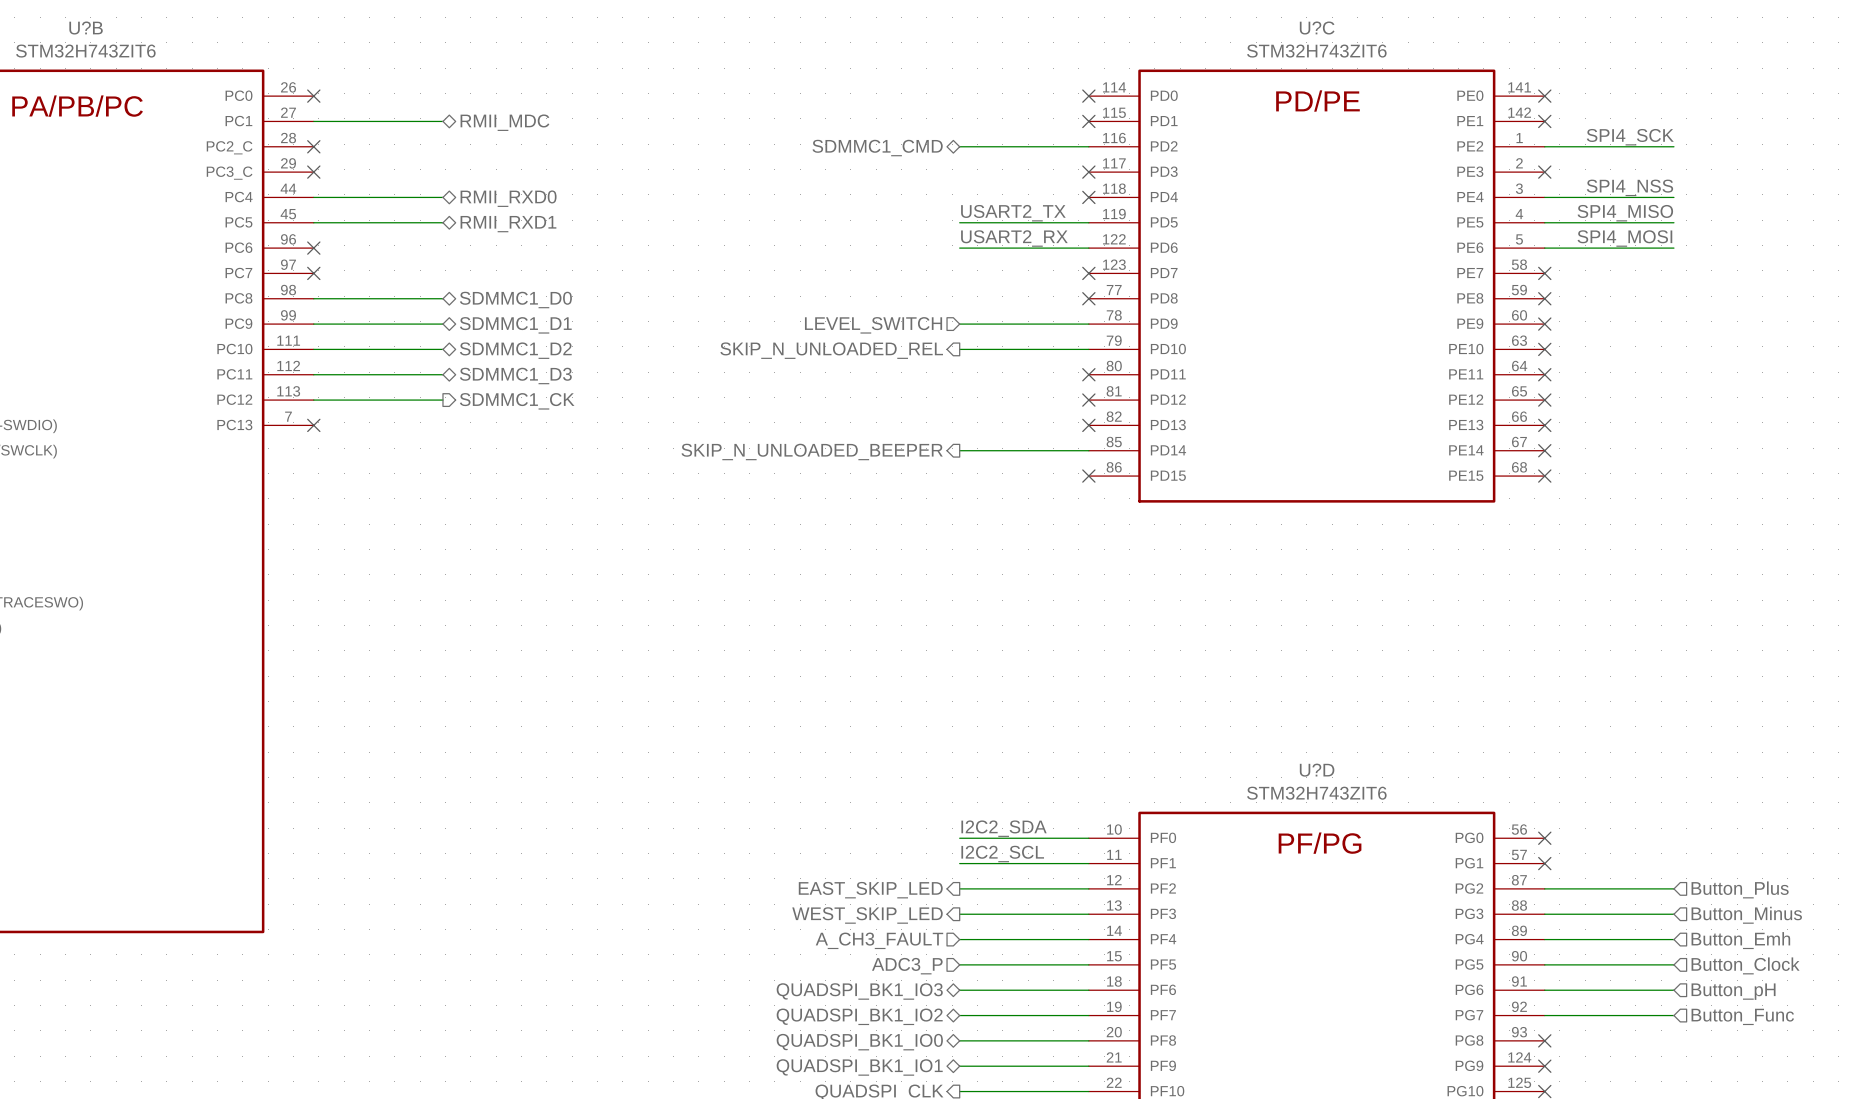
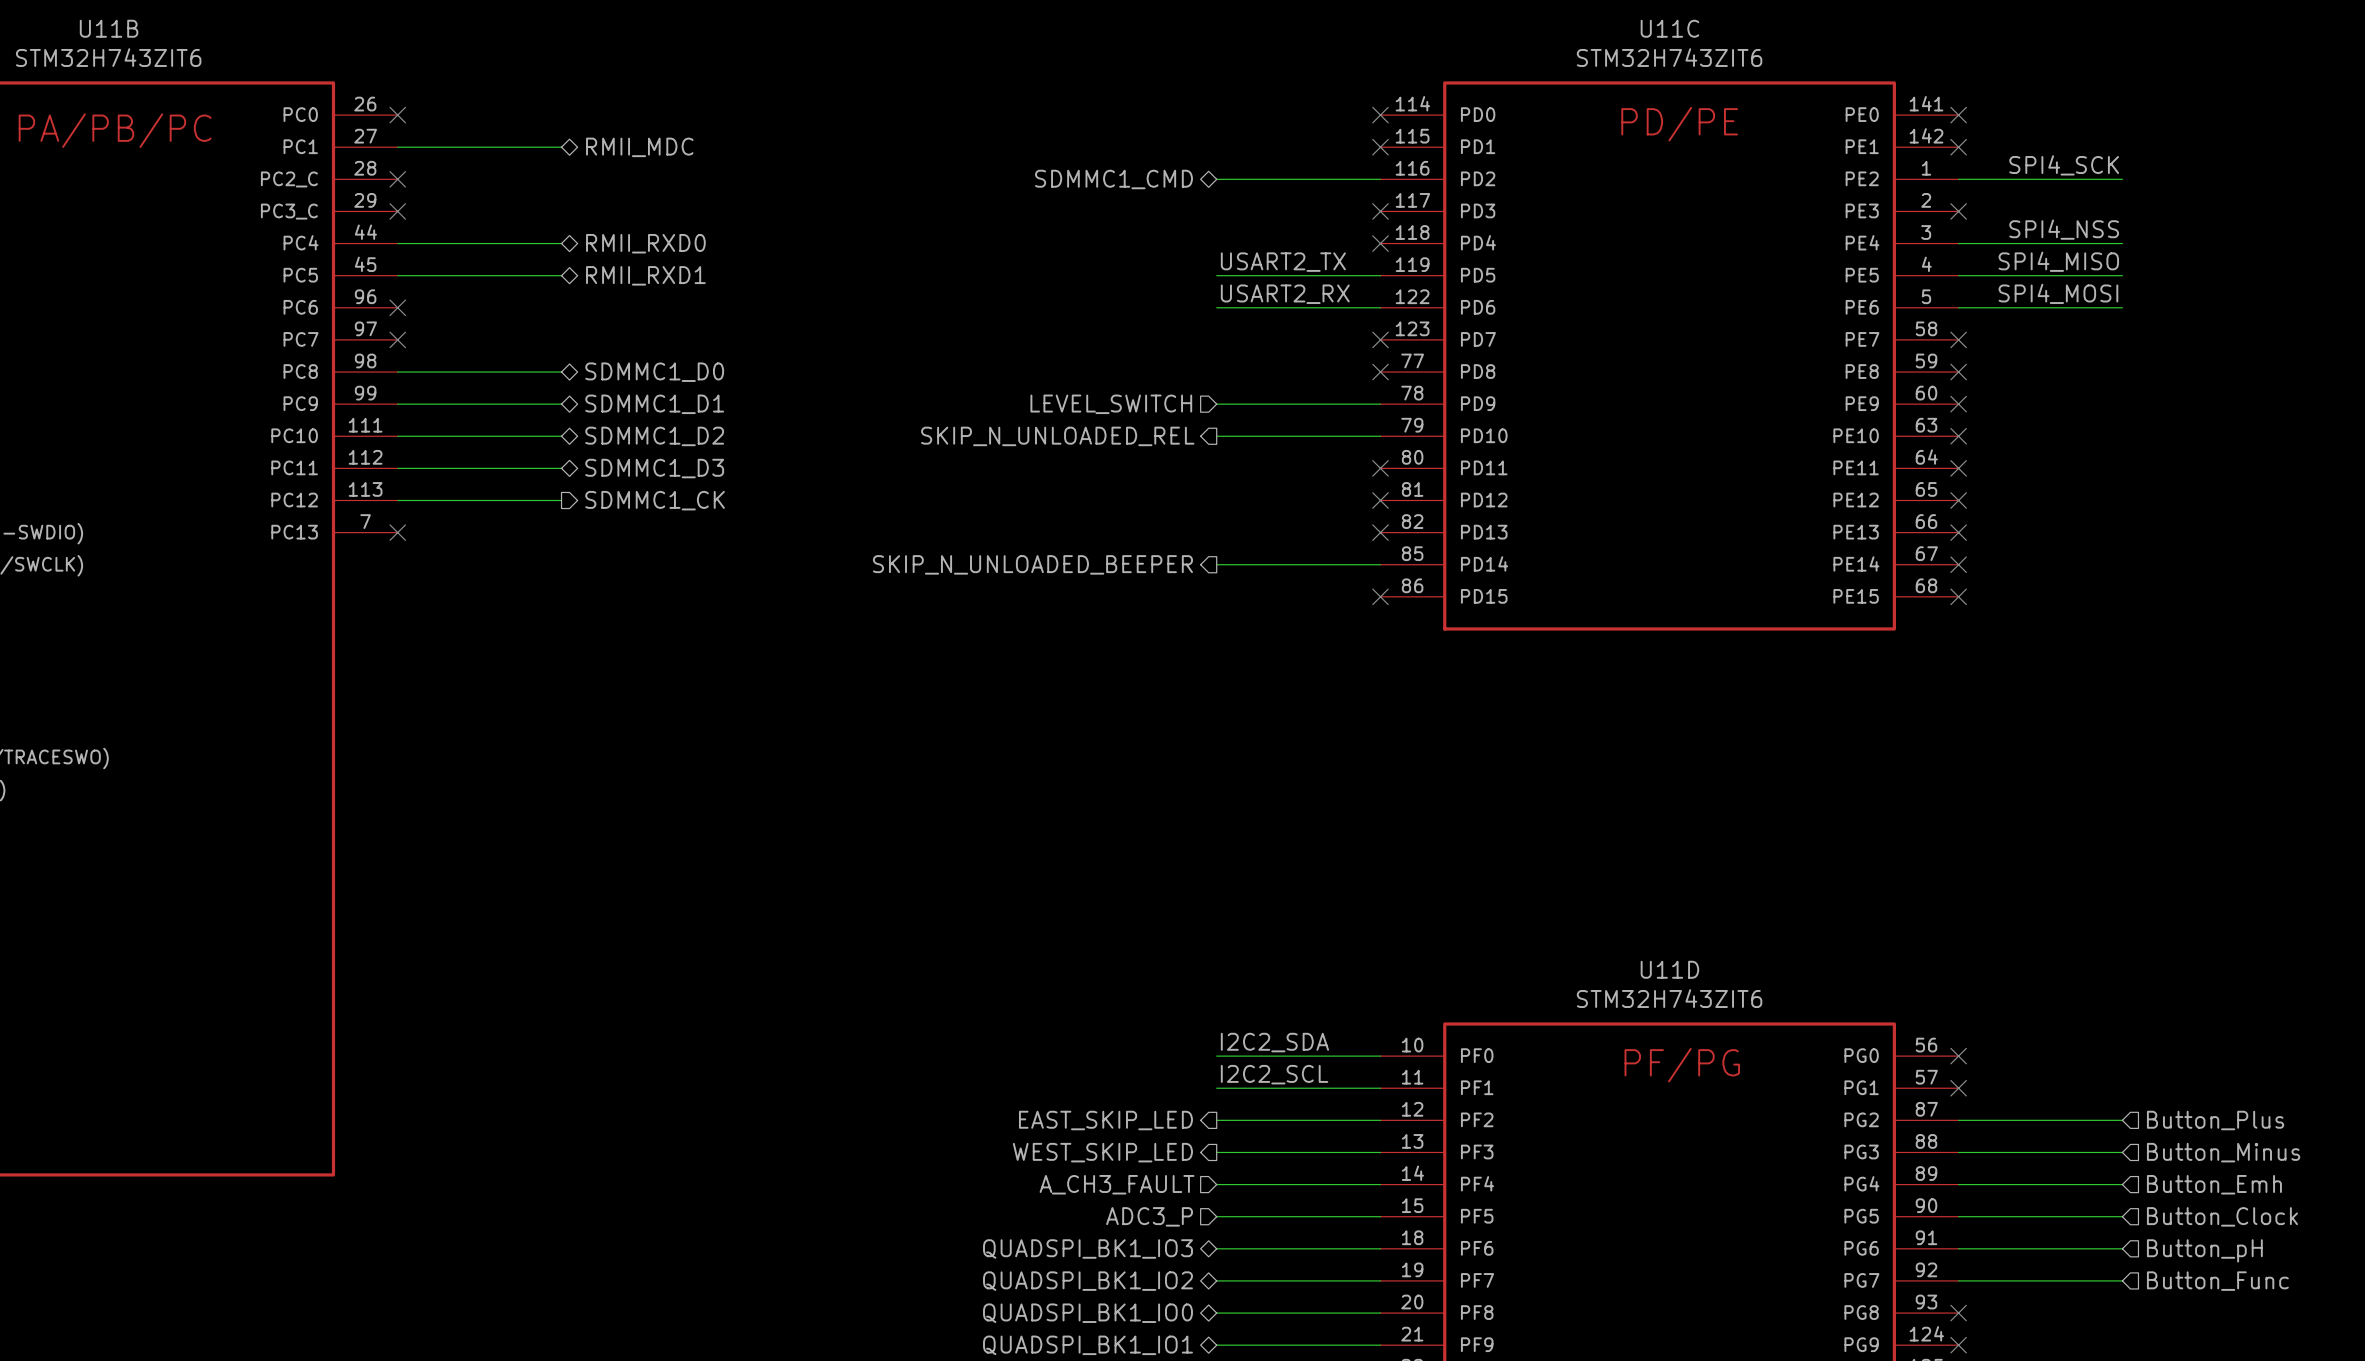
U?B name: U?B (86, 28) -> U11B (109, 28)
U?C name: U?C (1317, 28) -> U11C (1669, 28)
U?D name: U?D (1317, 770) -> U11D (1669, 969)

